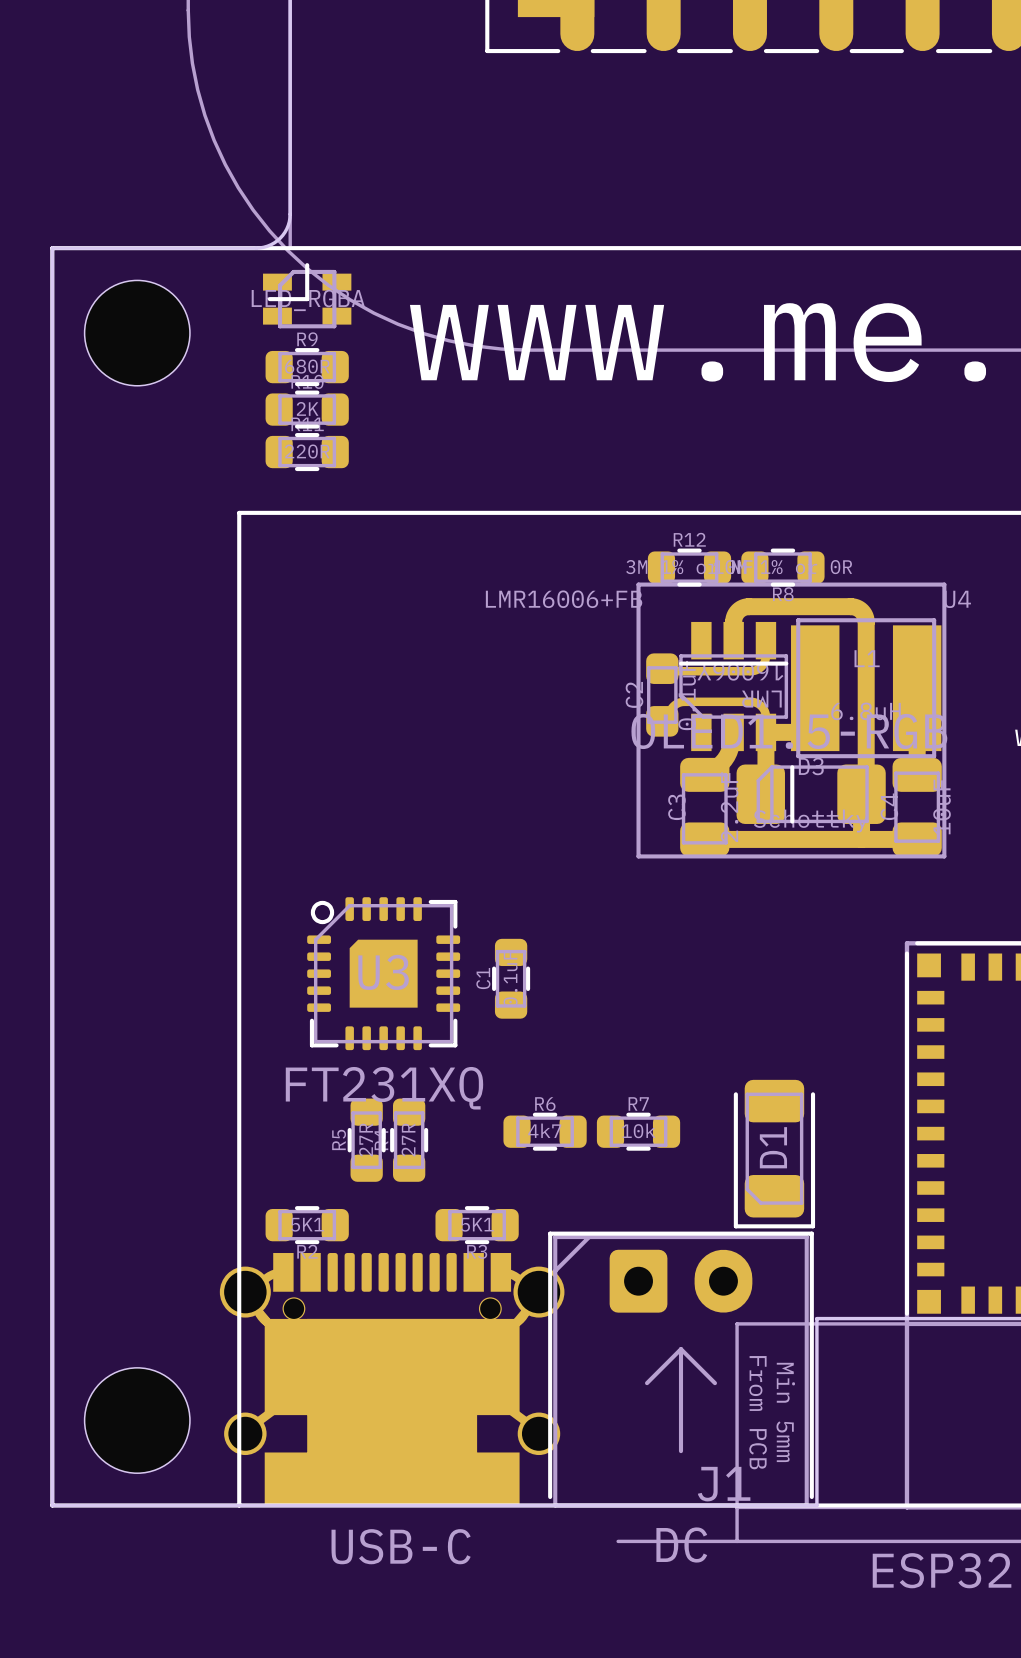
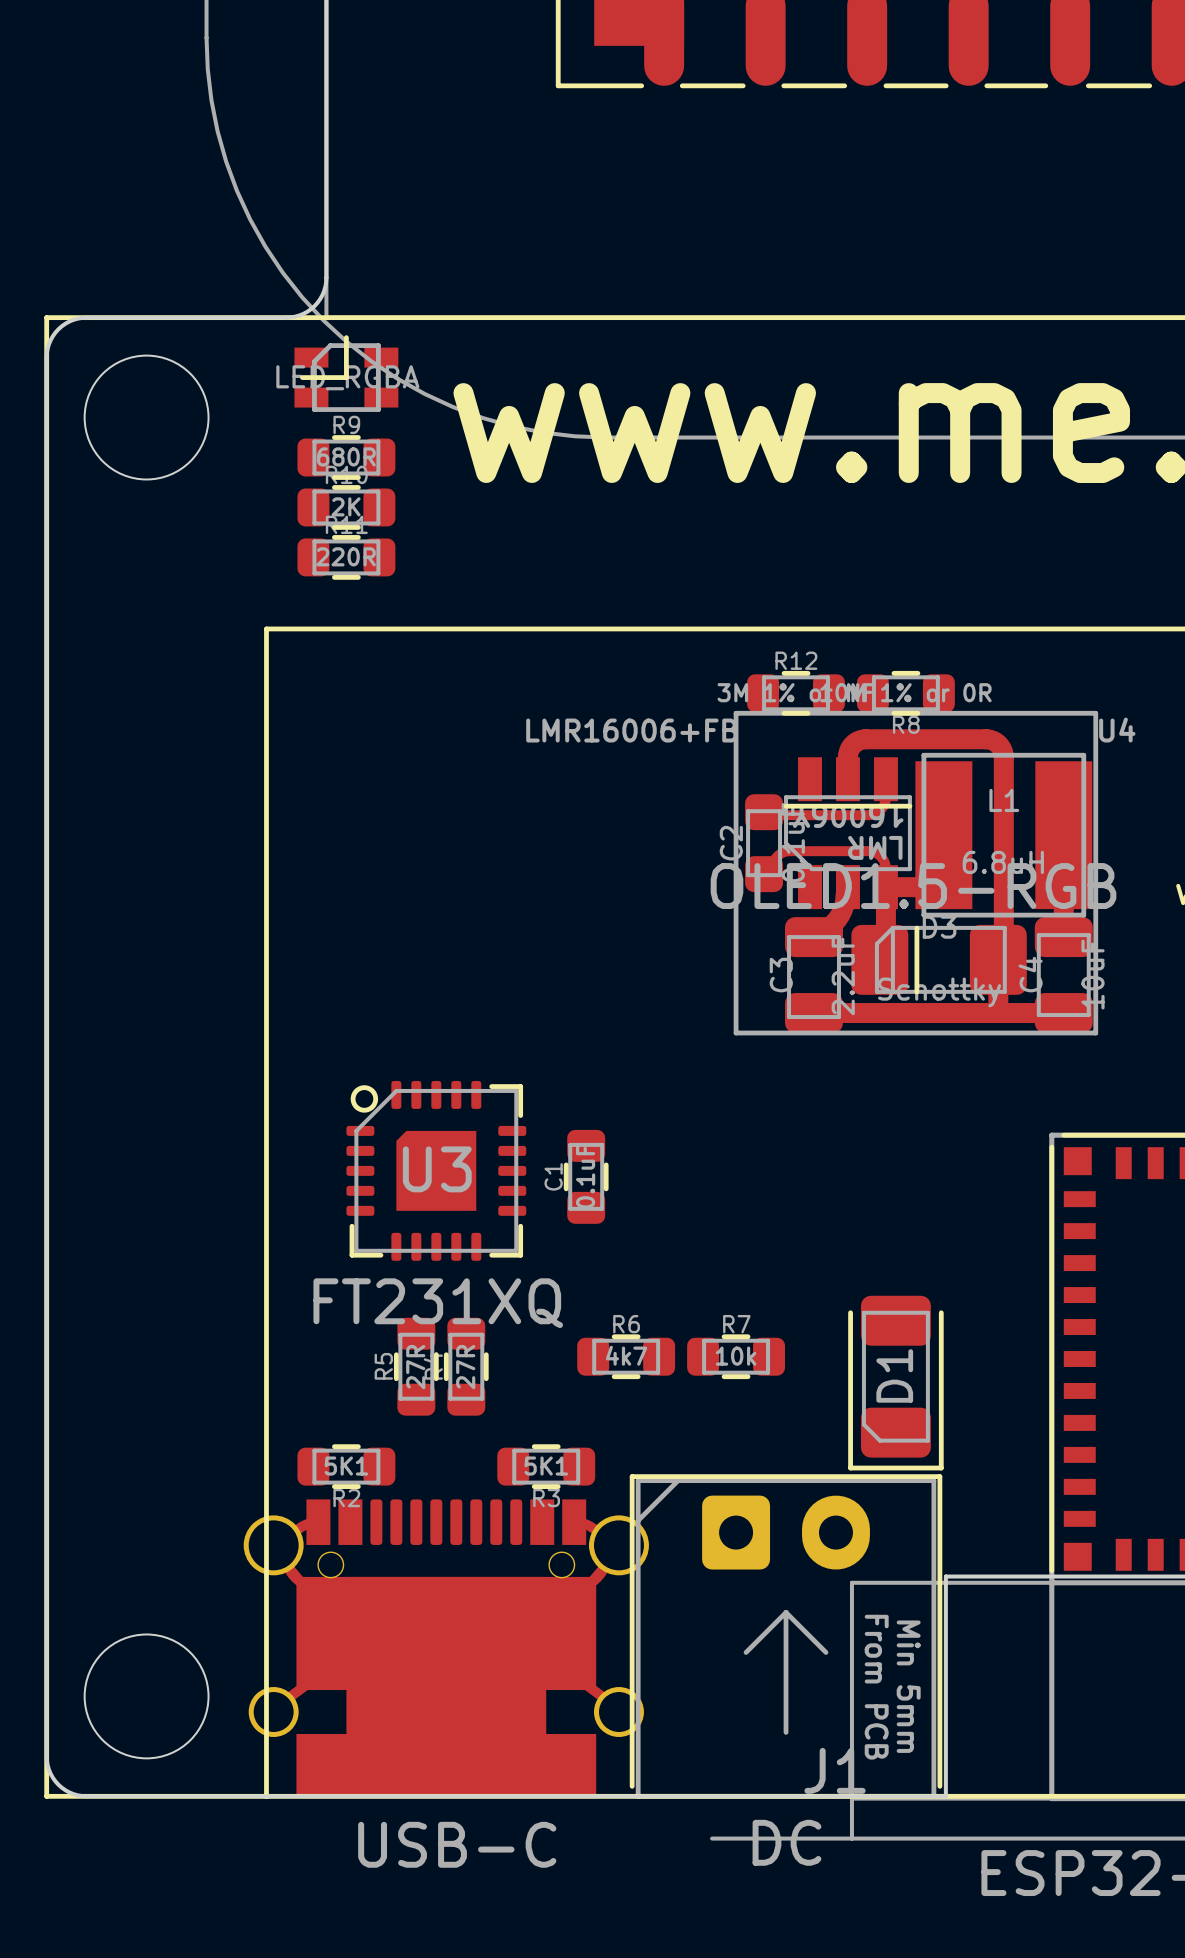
board edge: (86, 248) (52, 248) (52, 282) -> (86, 317) (69, 321) (58, 329) (48, 344) (46, 357)
board edge: (52, 1471) (52, 1505) (86, 1505) -> (46, 1756) (50, 1773) (58, 1784) (69, 1792) (86, 1796)

